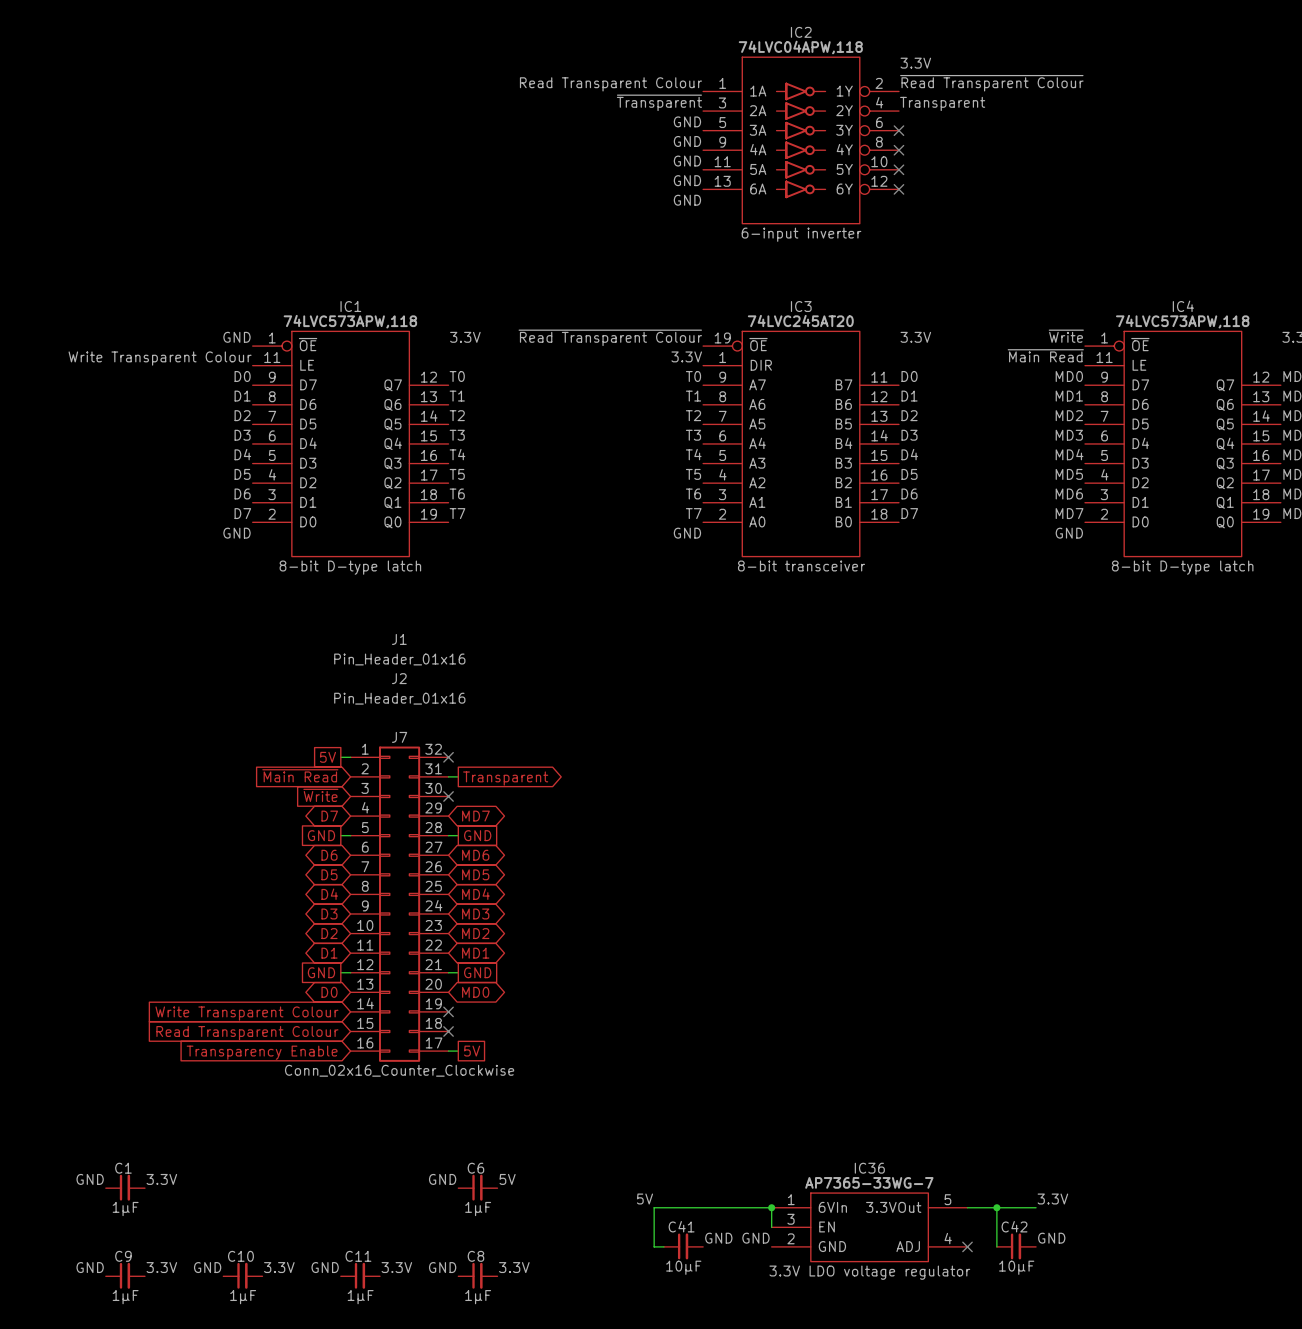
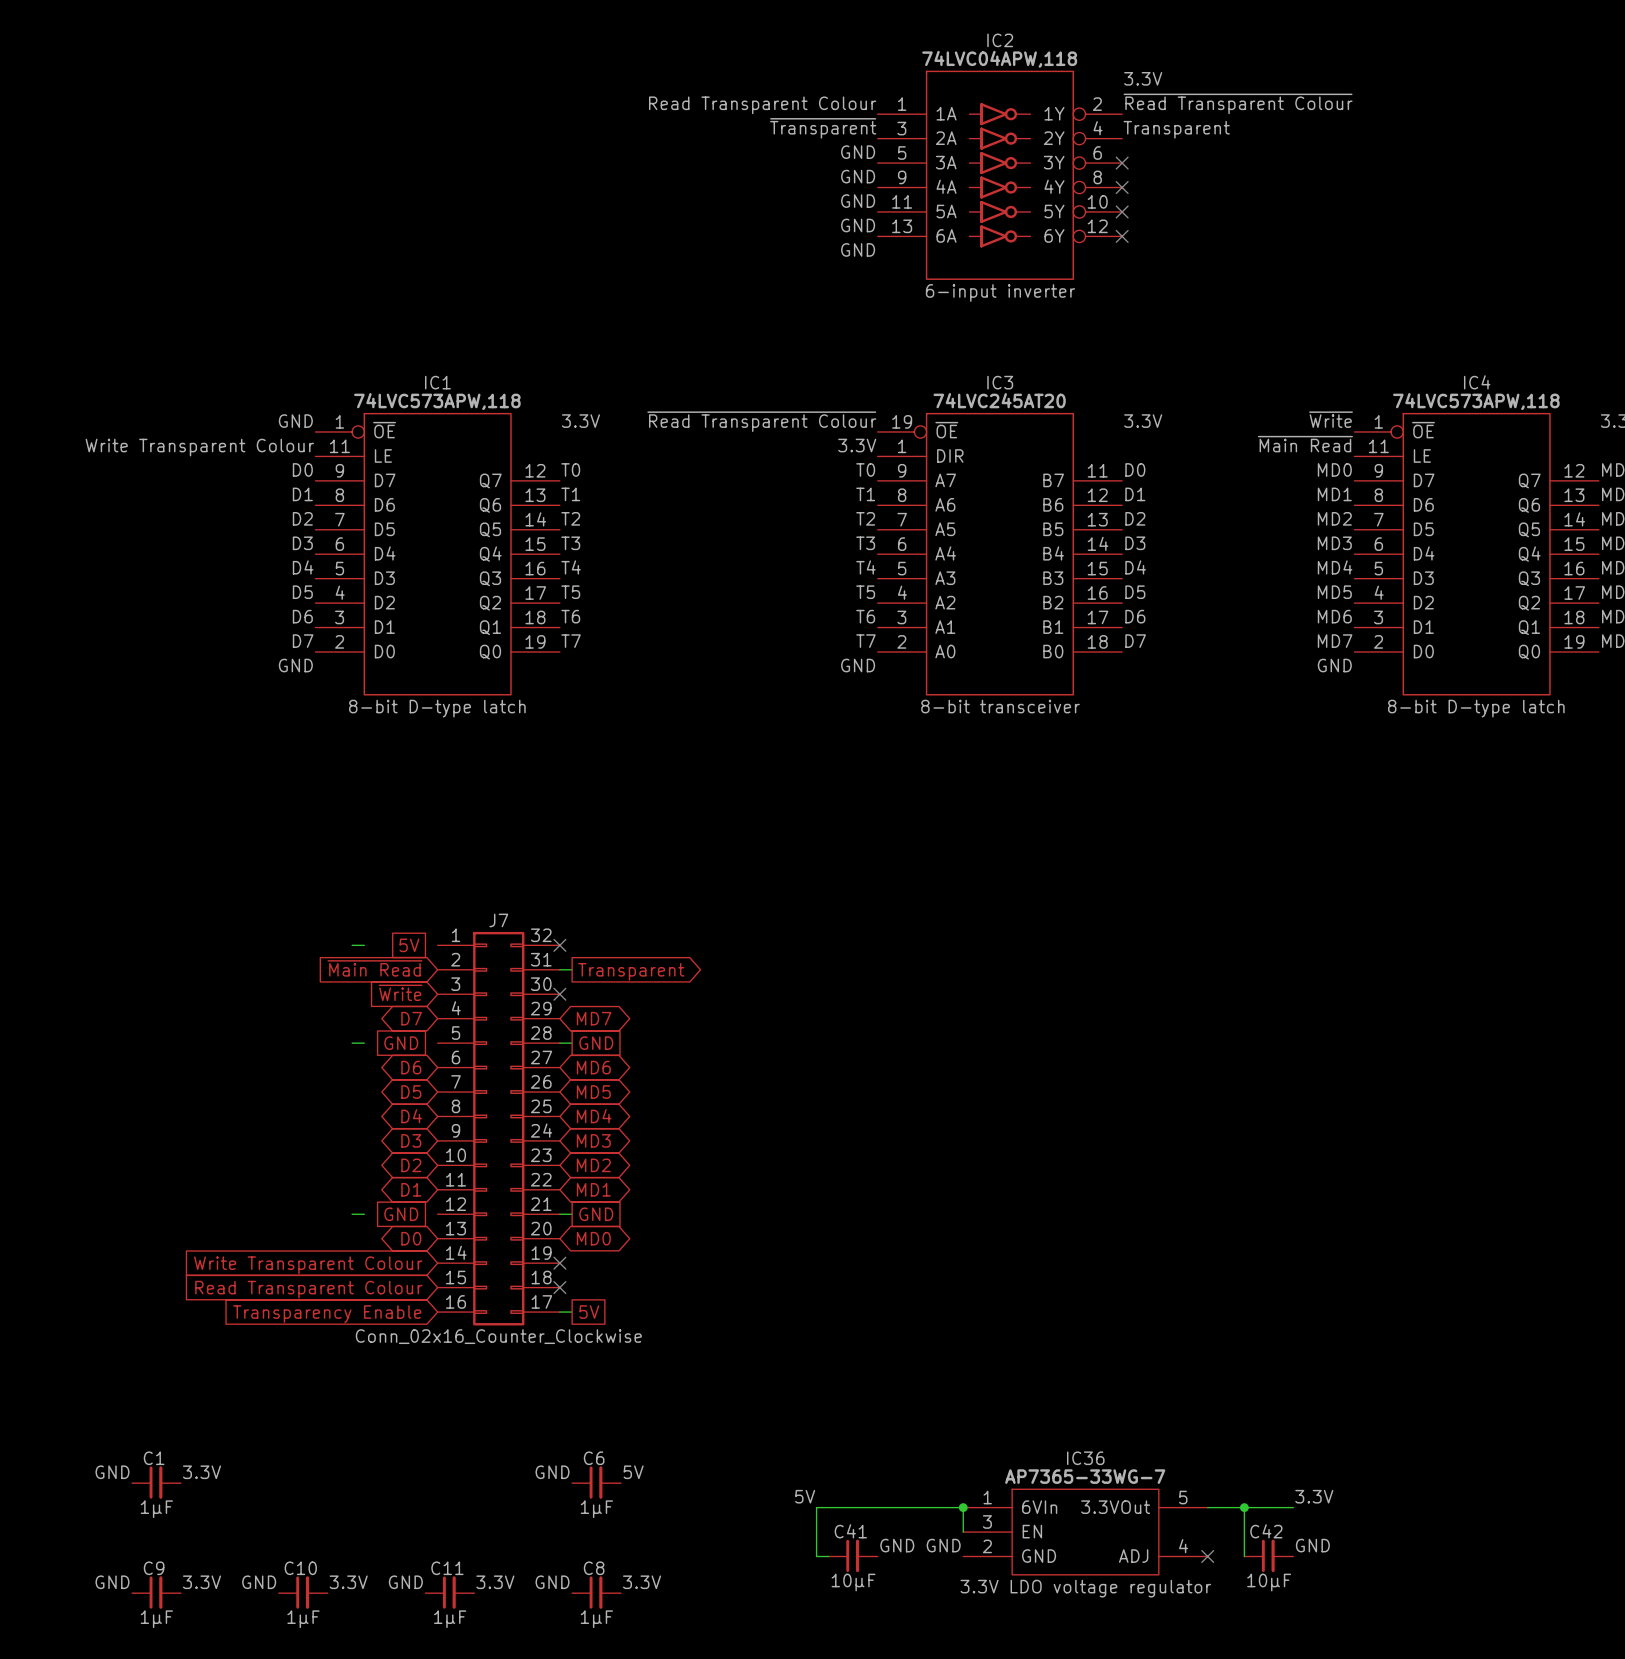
J1: Pin_Header_01x16 (399, 649) -> none
J2: Pin_Header_01x16 (399, 688) -> none
wire: (340, 757) (350, 757) -> (352, 945) (364, 945)
wire: (340, 835) (350, 835) -> (352, 1043) (364, 1043)
wire: (340, 972) (350, 972) -> (352, 1214) (364, 1214)

